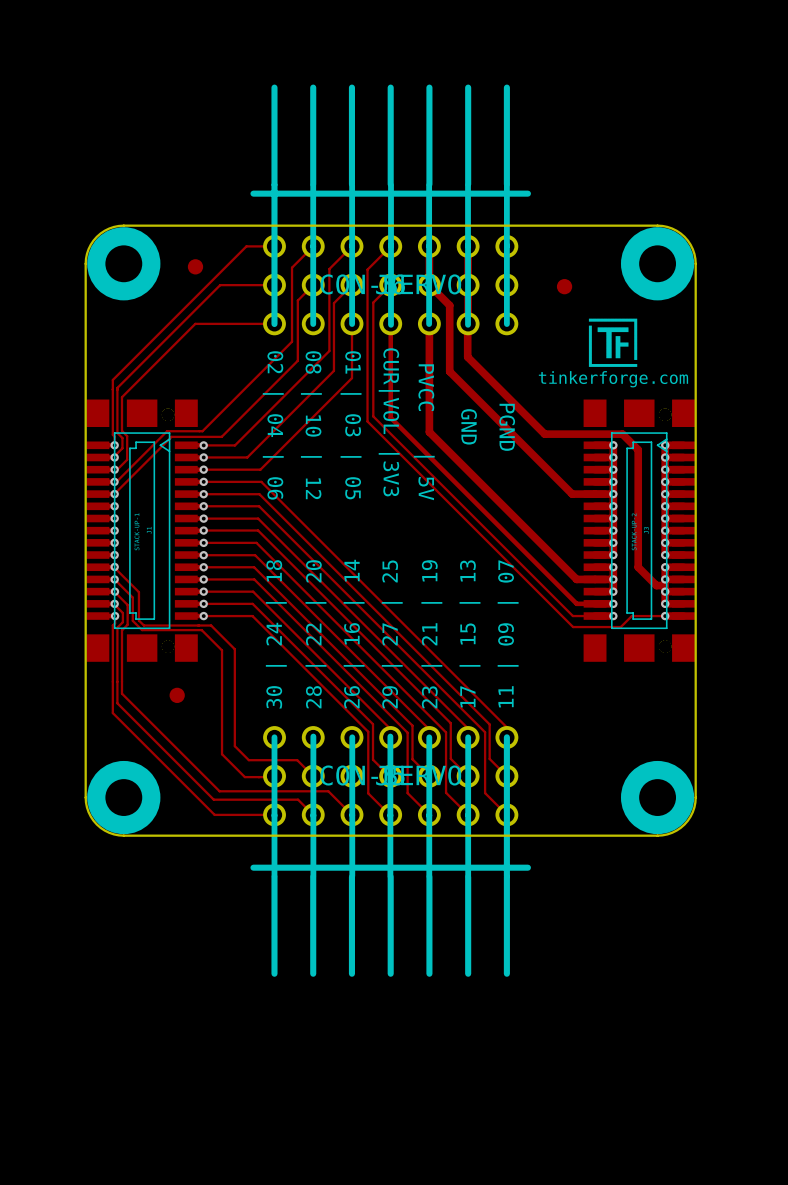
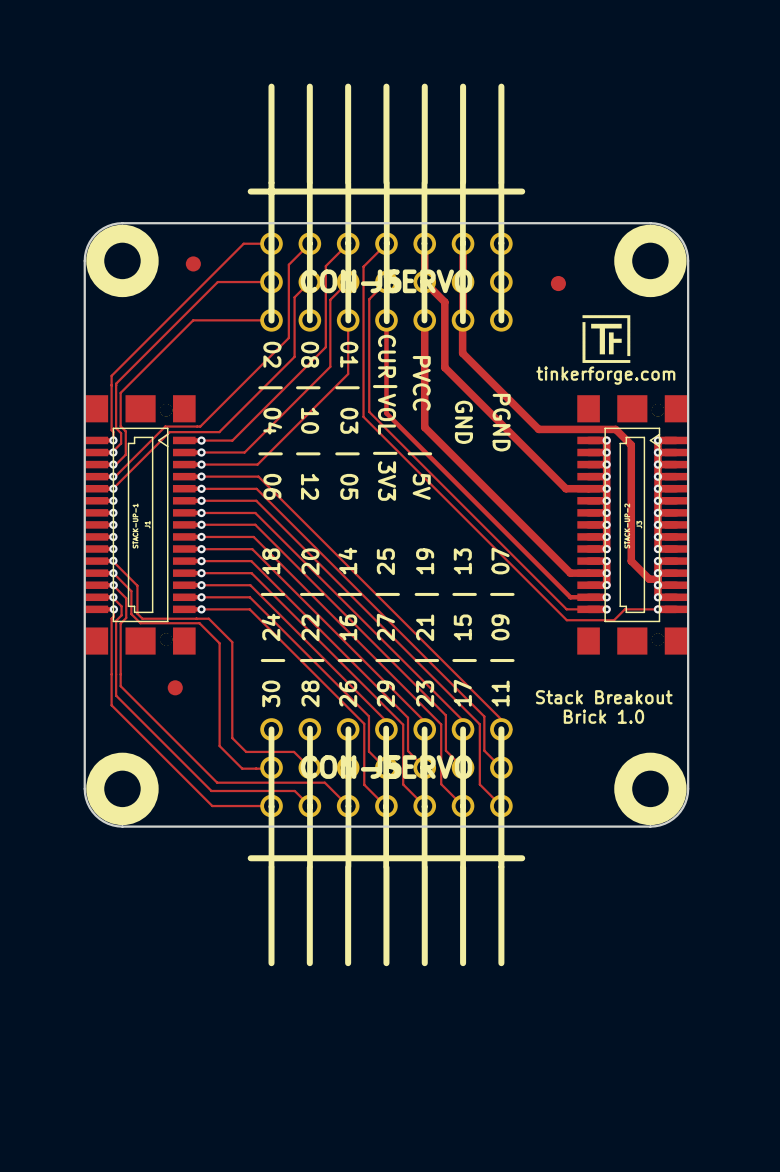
text: none -> Stack Breakout (604, 697)
text: none -> Brick 1.0 (603, 716)

